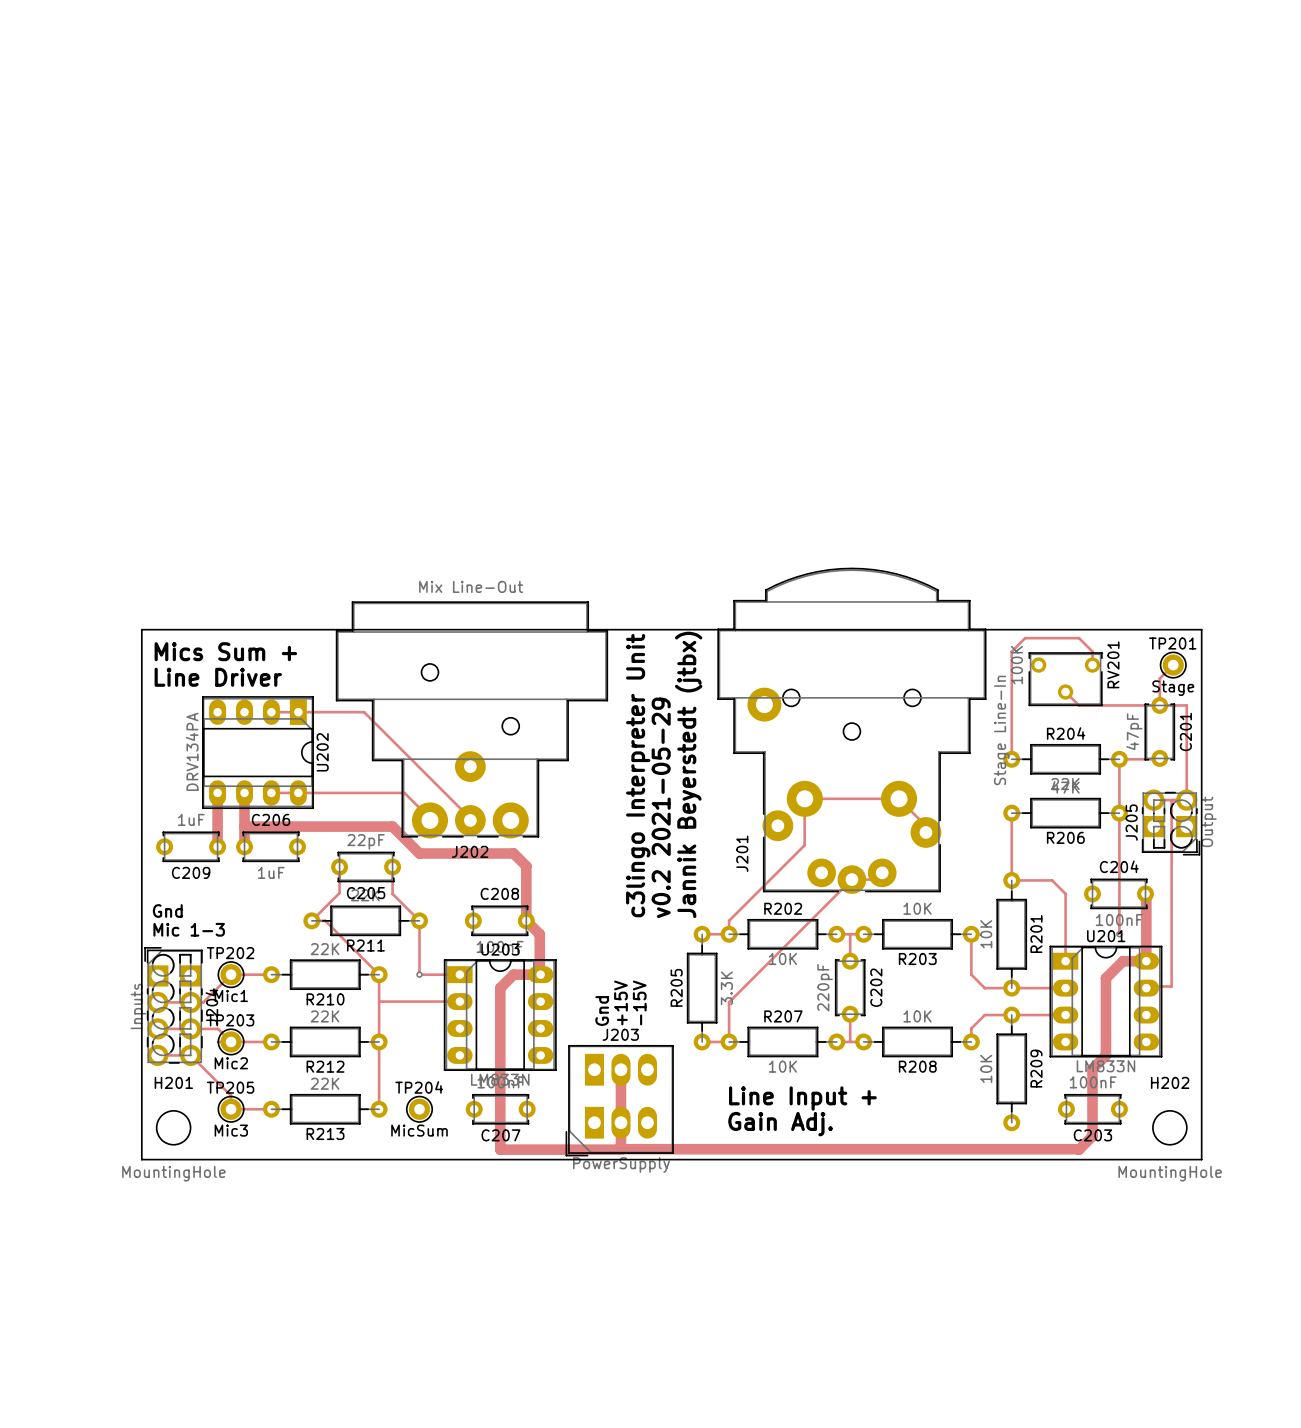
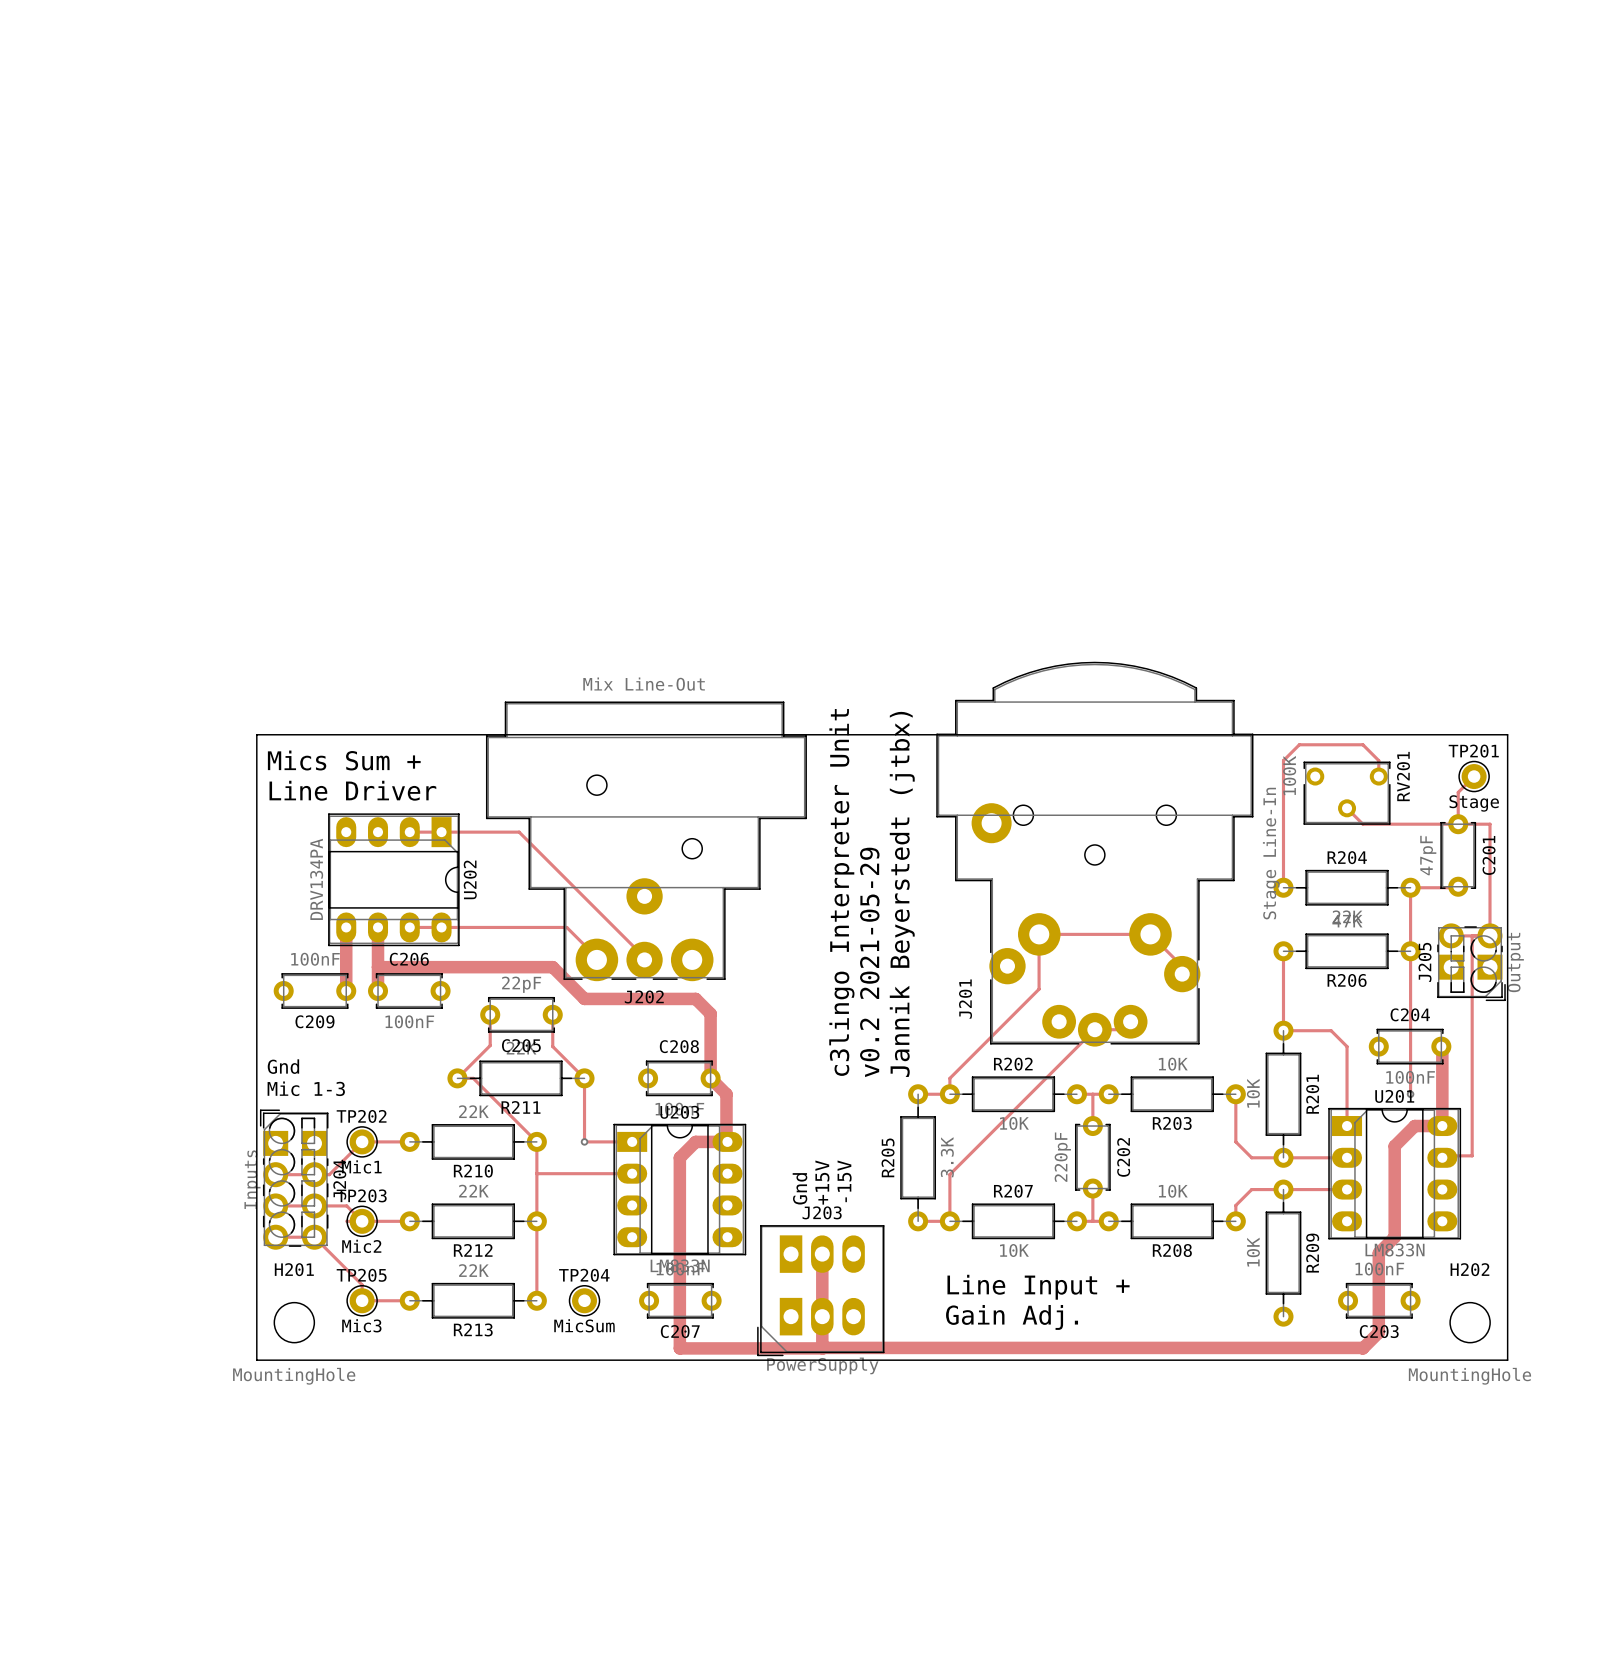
C209 value: 1uF (191, 819) -> 100nF (315, 959)
C206 value: 1uF (271, 872) -> 100nF (409, 1021)

